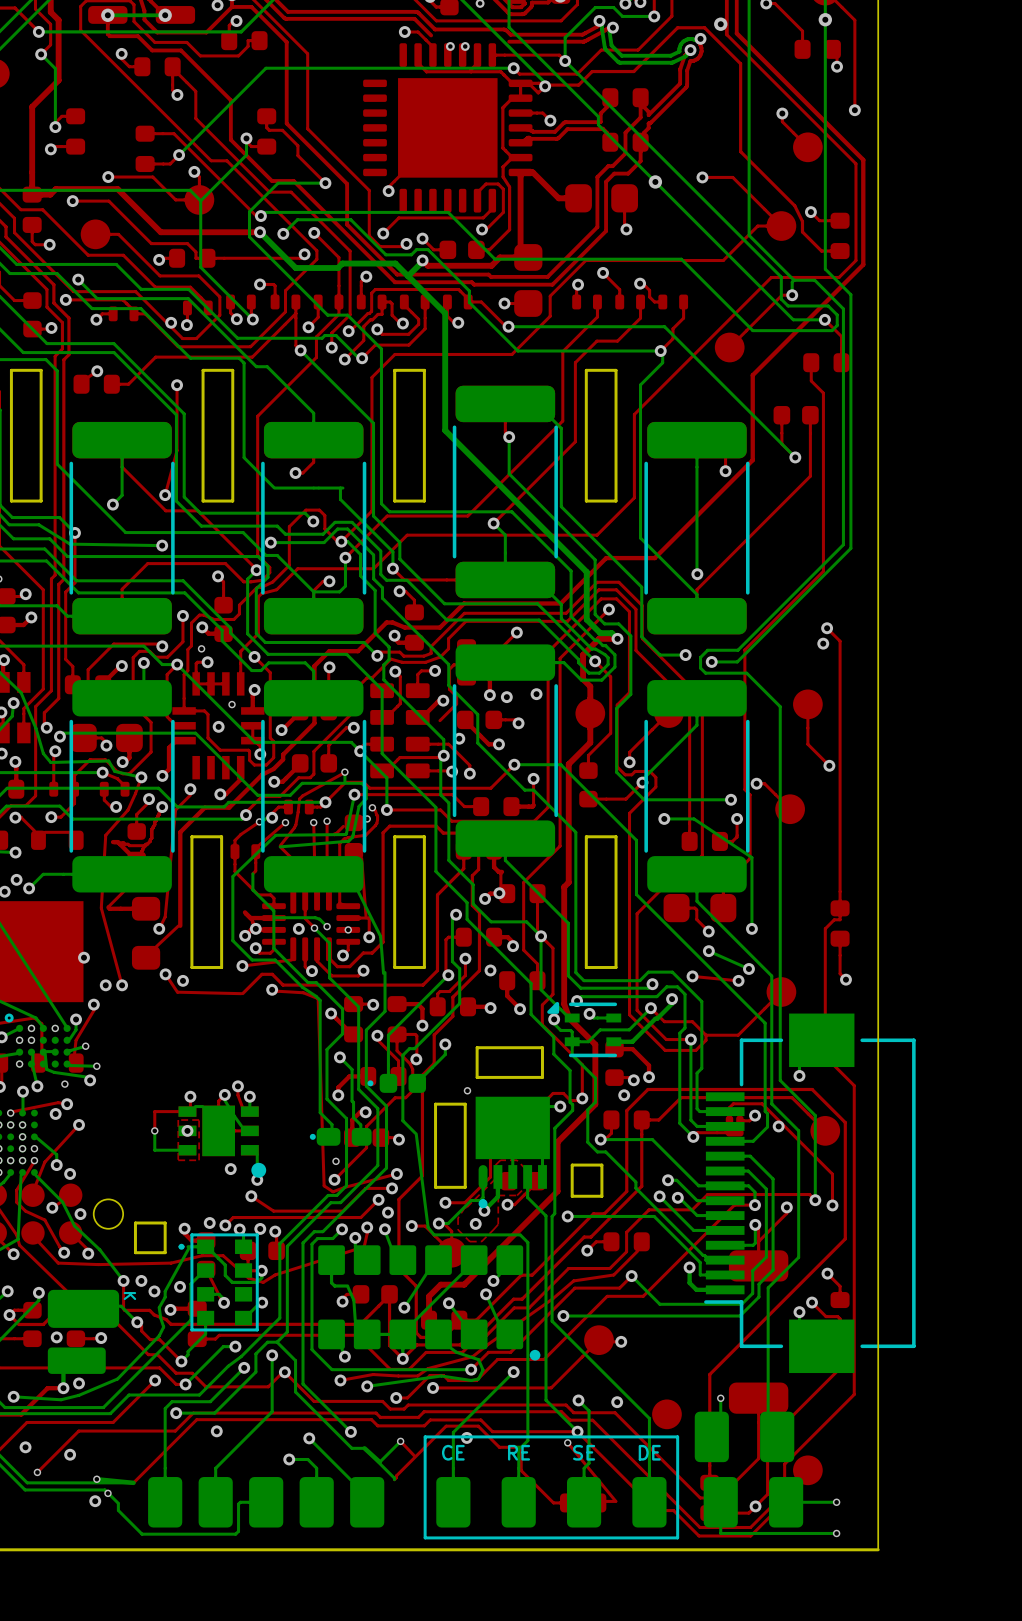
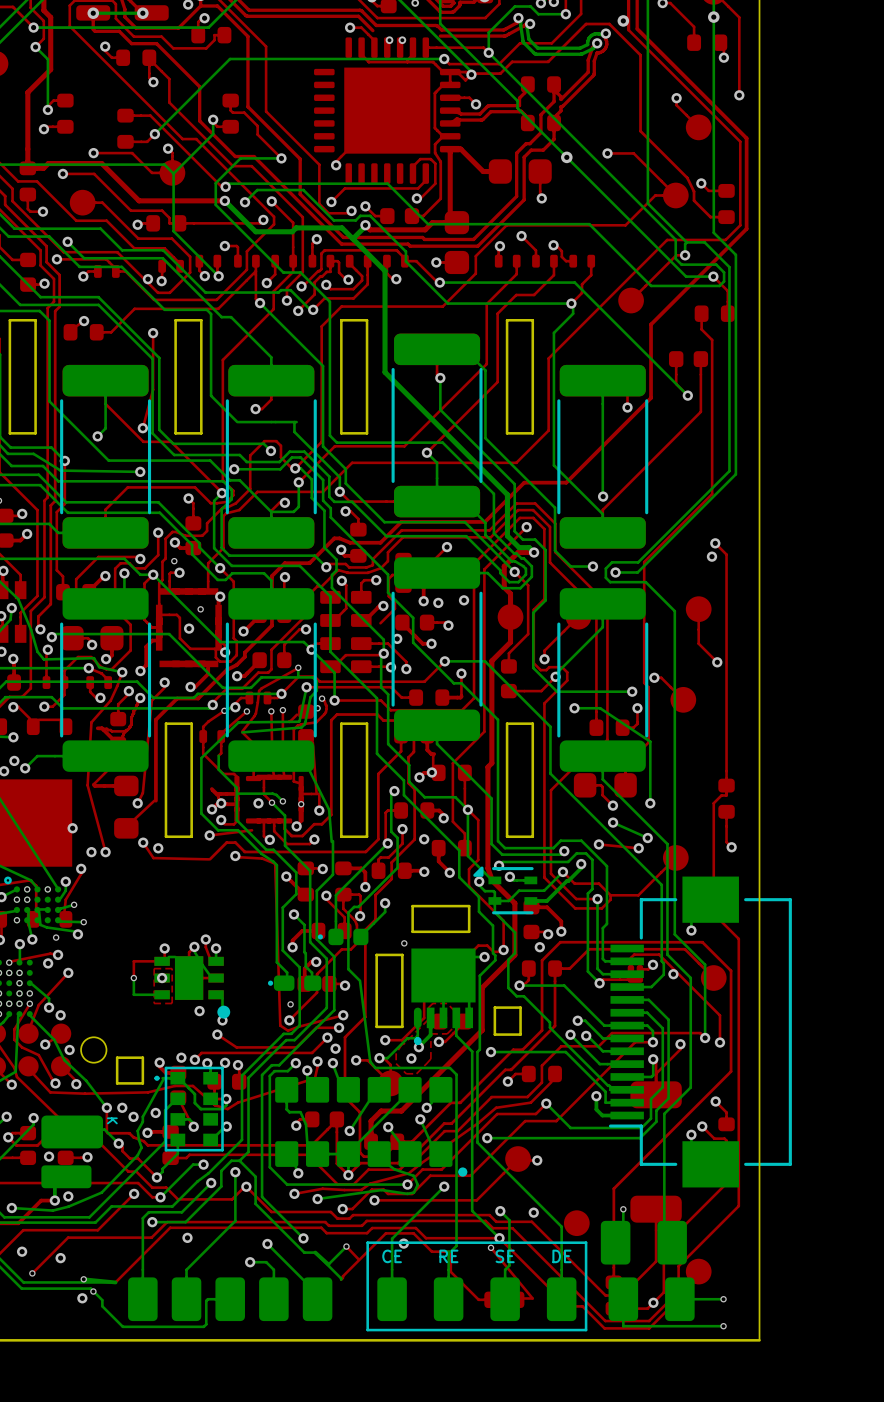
part footprint: [172, 672, 265, 780] -> [155, 588, 222, 668]
part footprint: [262, 886, 361, 962] -> [234, 774, 304, 824]

